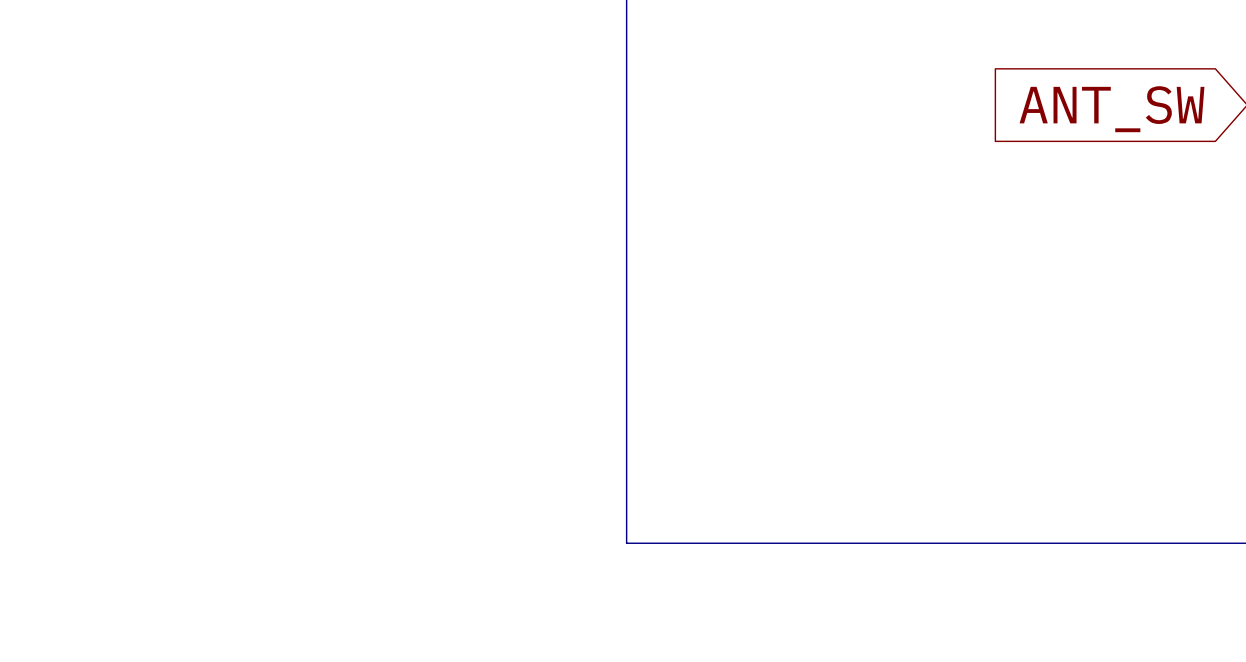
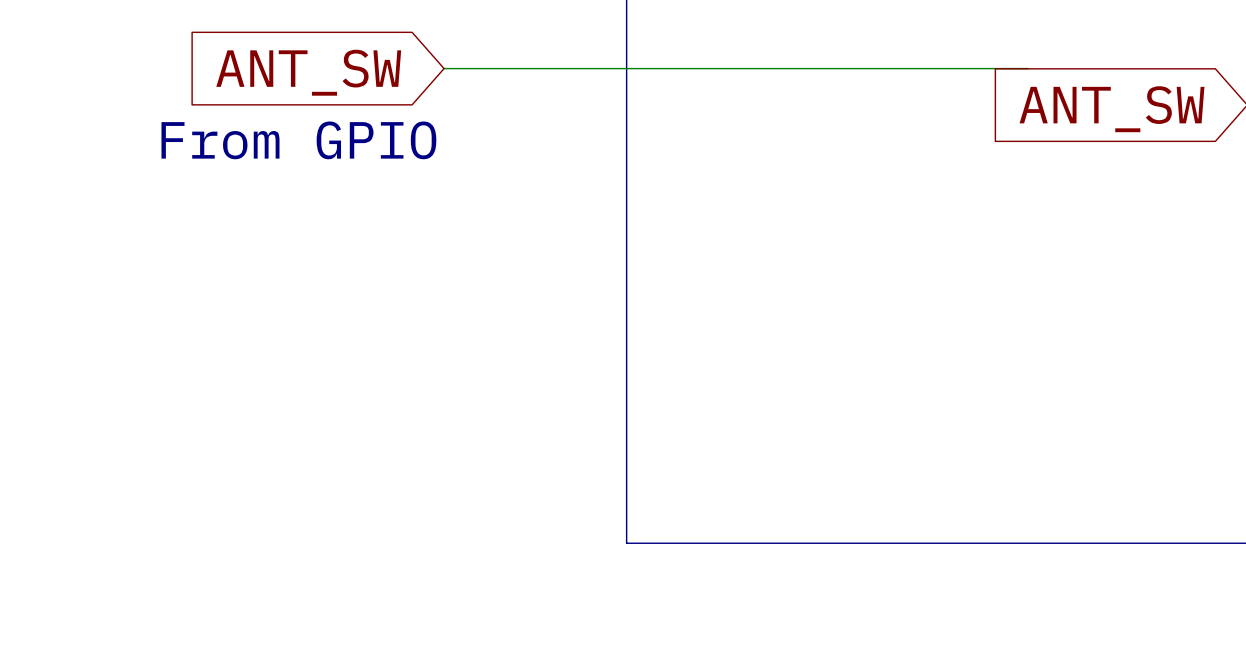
wire: none -> (444, 68) (1028, 68)
global label: none -> ANT_SW (308, 72)
text: none -> From GPIO (298, 140)

